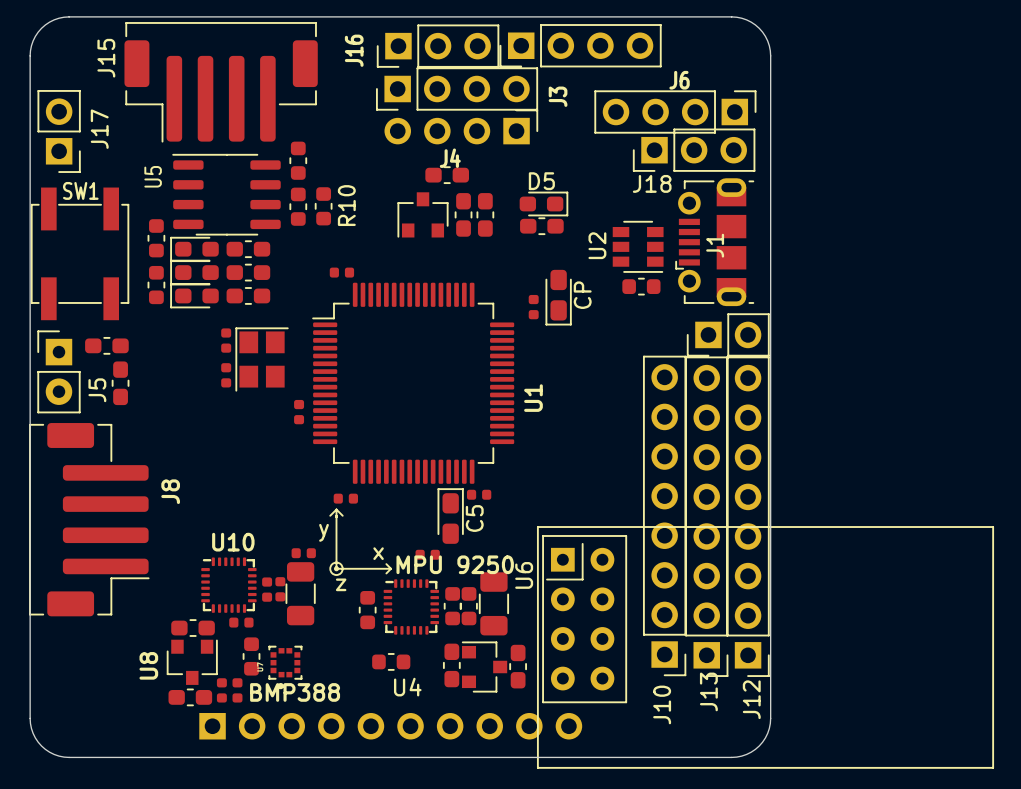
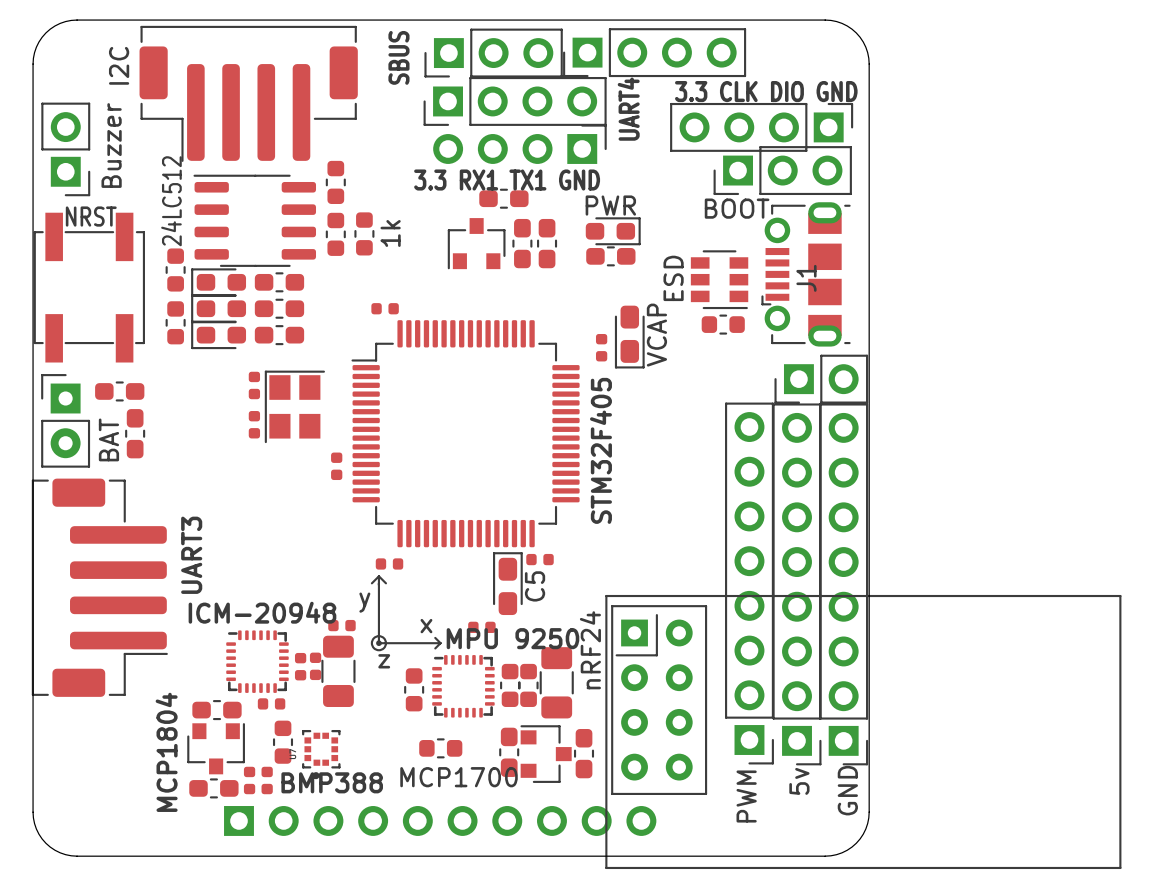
J16 name: J16 (354, 50) -> SBUS (398, 57)
J15 name: J15 (106, 58) -> I2C (119, 65)
J6 name: J6 (679, 80) -> 3.3 CLK DIO GND (766, 91)
J3 name: J3 (558, 96) -> UART4 (628, 109)
J17 name: J17 (99, 129) -> Buzzer (111, 145)
J4 name: J4 (450, 158) -> 3.3 RX1 TX1 GND (507, 180)
U5 name: U5 (153, 176) -> 24LC512 (171, 201)
D5 name: D5 (541, 181) -> PWR (610, 205)
J18 name: J18 (652, 183) -> BOOT (737, 208)
SW1 name: SW1 (80, 190) -> NRST (91, 216)
R10 name: R10 (346, 205) -> 1k (390, 233)
U2 name: U2 (597, 245) -> ESD (673, 278)
part value: CP (582, 295) -> VCAP (656, 335)
J5 name: J5 (97, 390) -> BAT (108, 439)
U1 name: U1 (533, 398) -> STM32F405 (600, 450)
J8 name: J8 (170, 491) -> UART3 (191, 555)
U10 name: U10 (233, 542) -> ICM-20948 (262, 612)
U6 name: U6 (524, 575) -> nRF24 (590, 650)
U8 name: U8 (148, 665) -> MCP1804 (166, 752)
U4 name: U4 (407, 687) -> MCP1700 (459, 777)
J13 name: J13 (708, 691) -> 5v (799, 781)
J12 name: J12 (751, 699) -> GND (847, 790)
J10 name: J10 (662, 704) -> PWM (746, 796)

